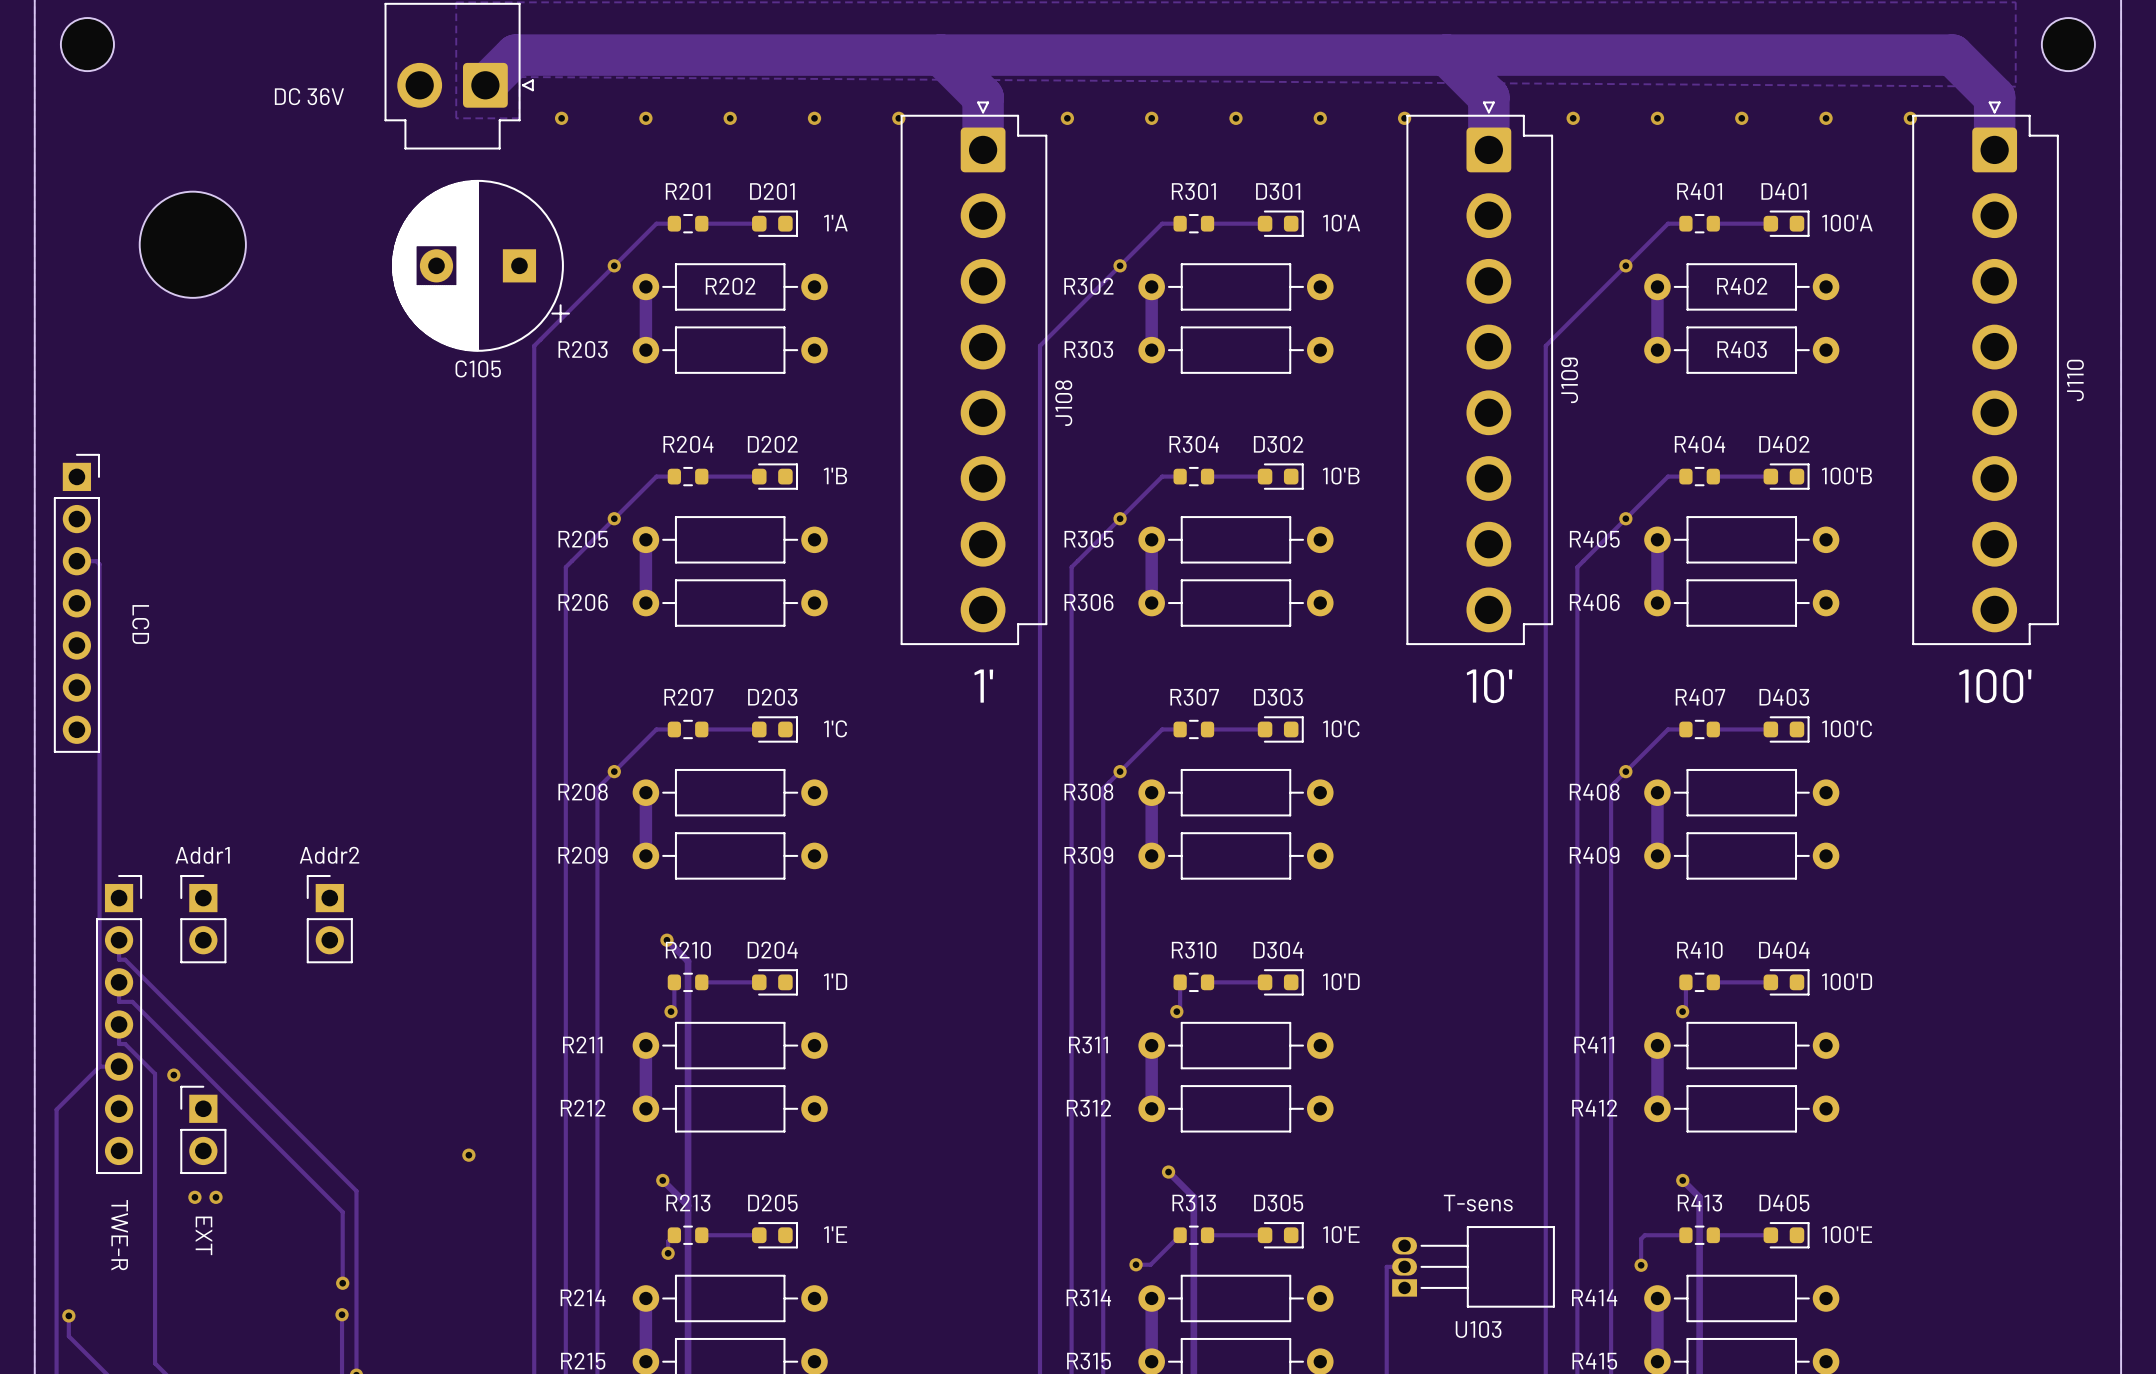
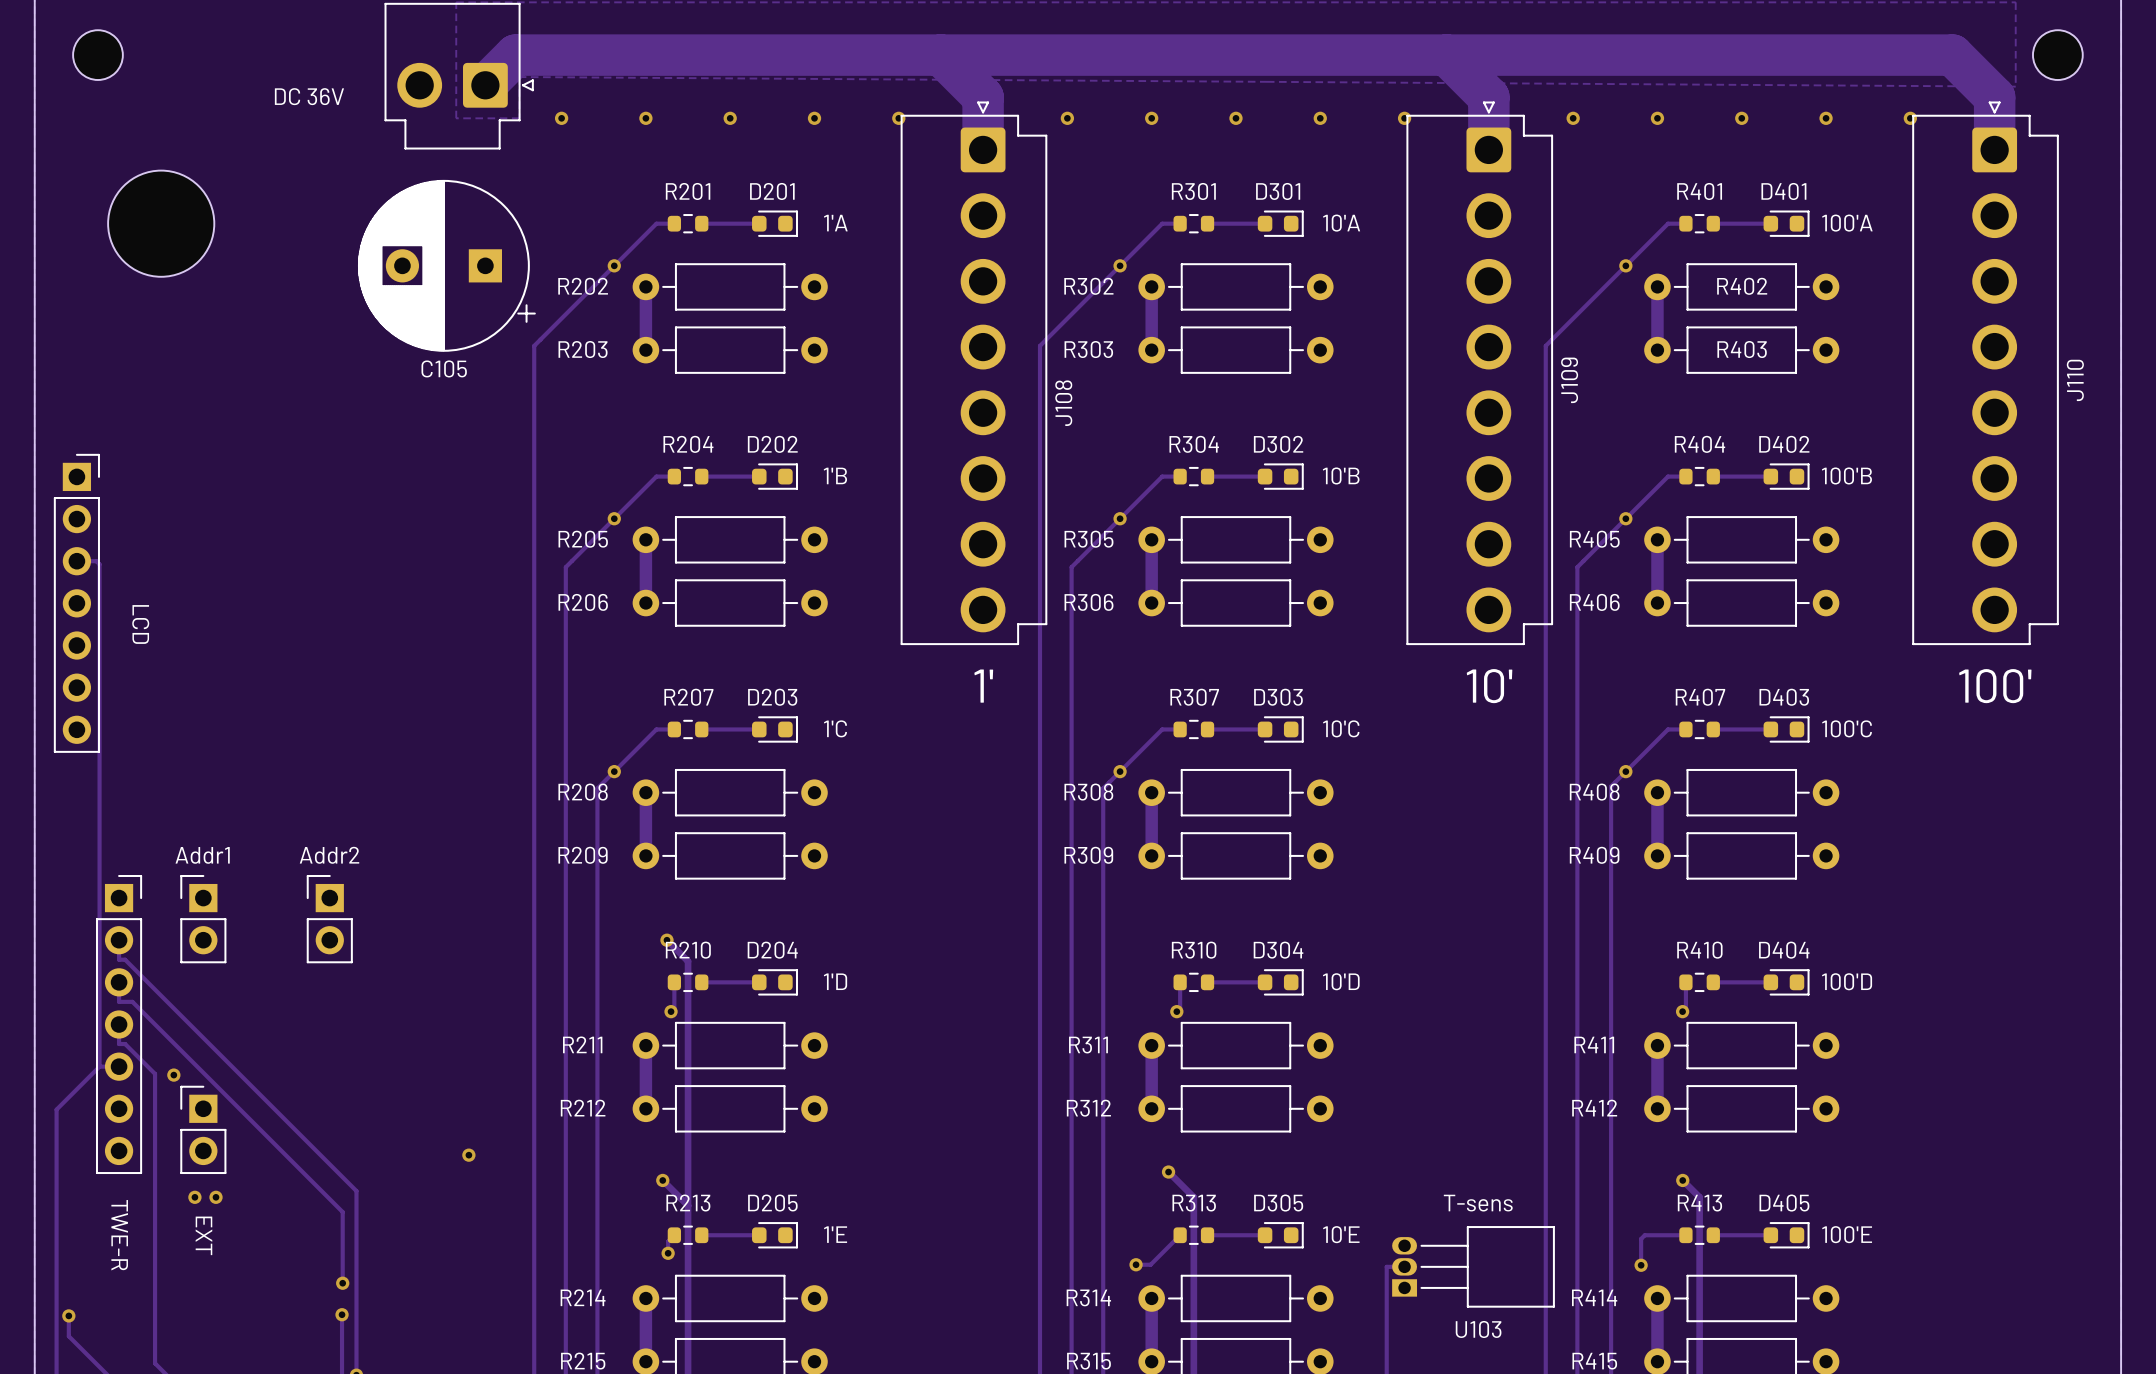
part footprint: [60, 18, 114, 72] -> [73, 30, 123, 80]
part footprint: [2041, 18, 2095, 72] -> [2032, 30, 2083, 80]
part position: (192, 244) -> (161, 223)
C105 position: (480, 265) -> (446, 265)
R202 name position: R202 (730, 286) -> R202 (583, 286)

